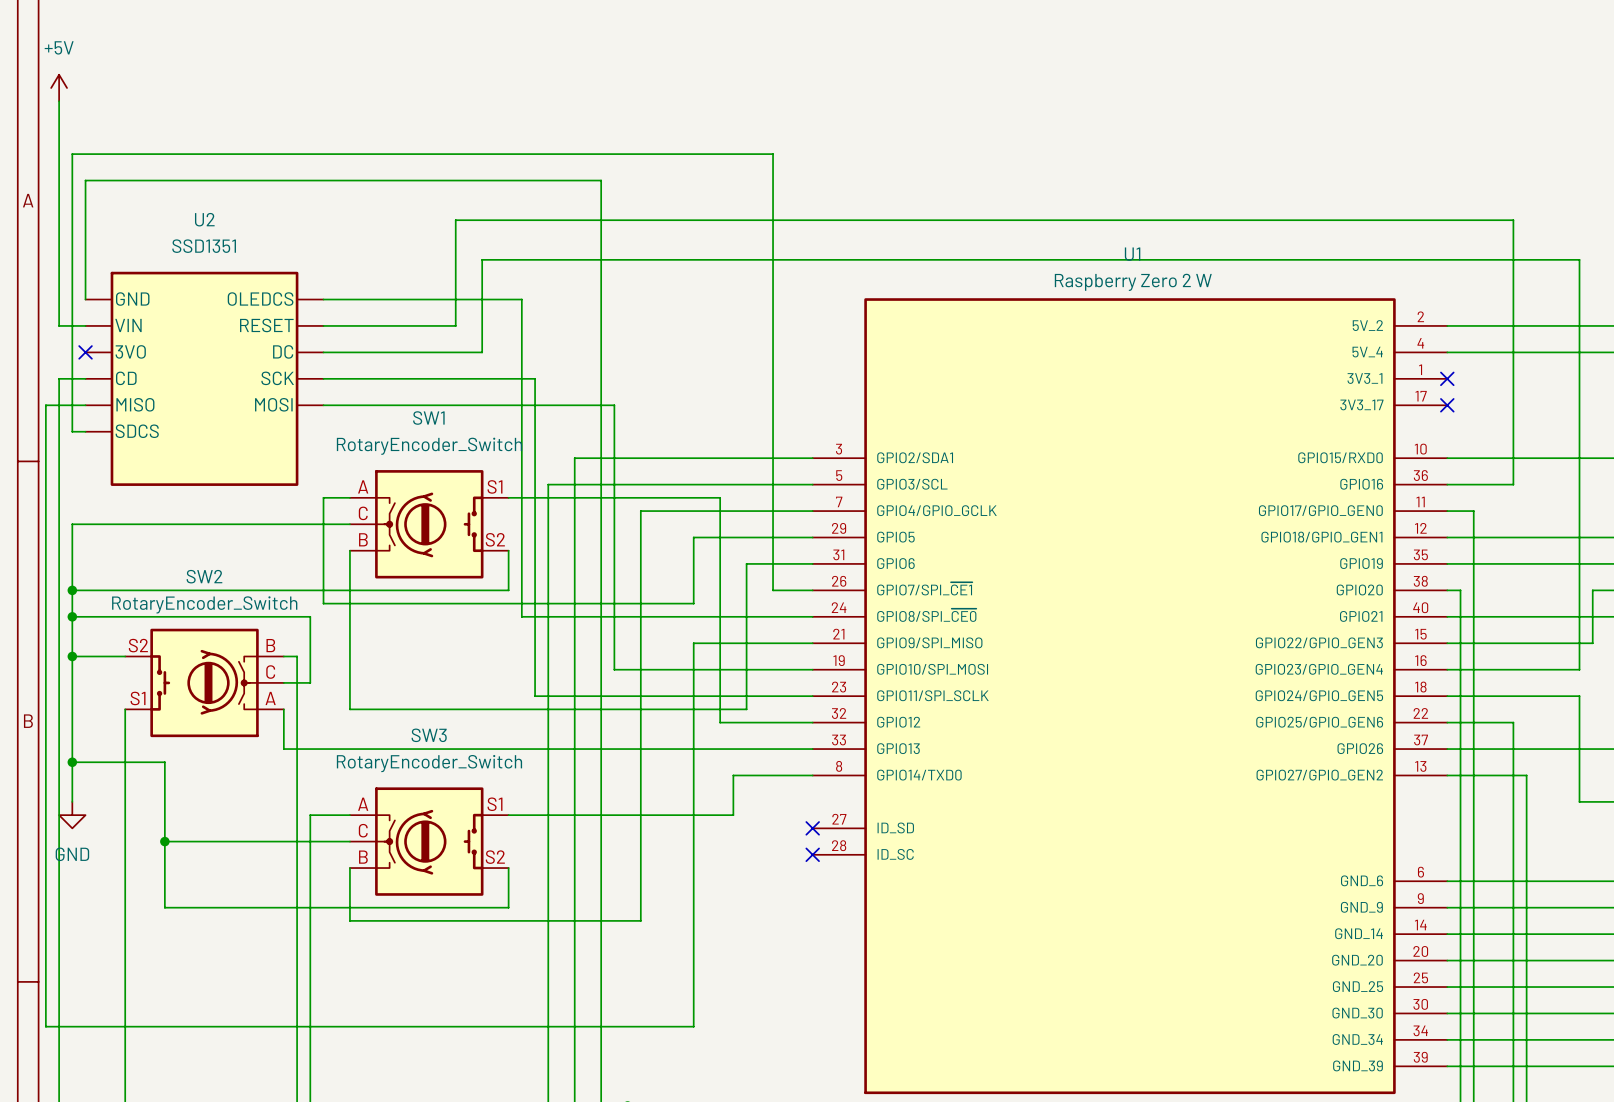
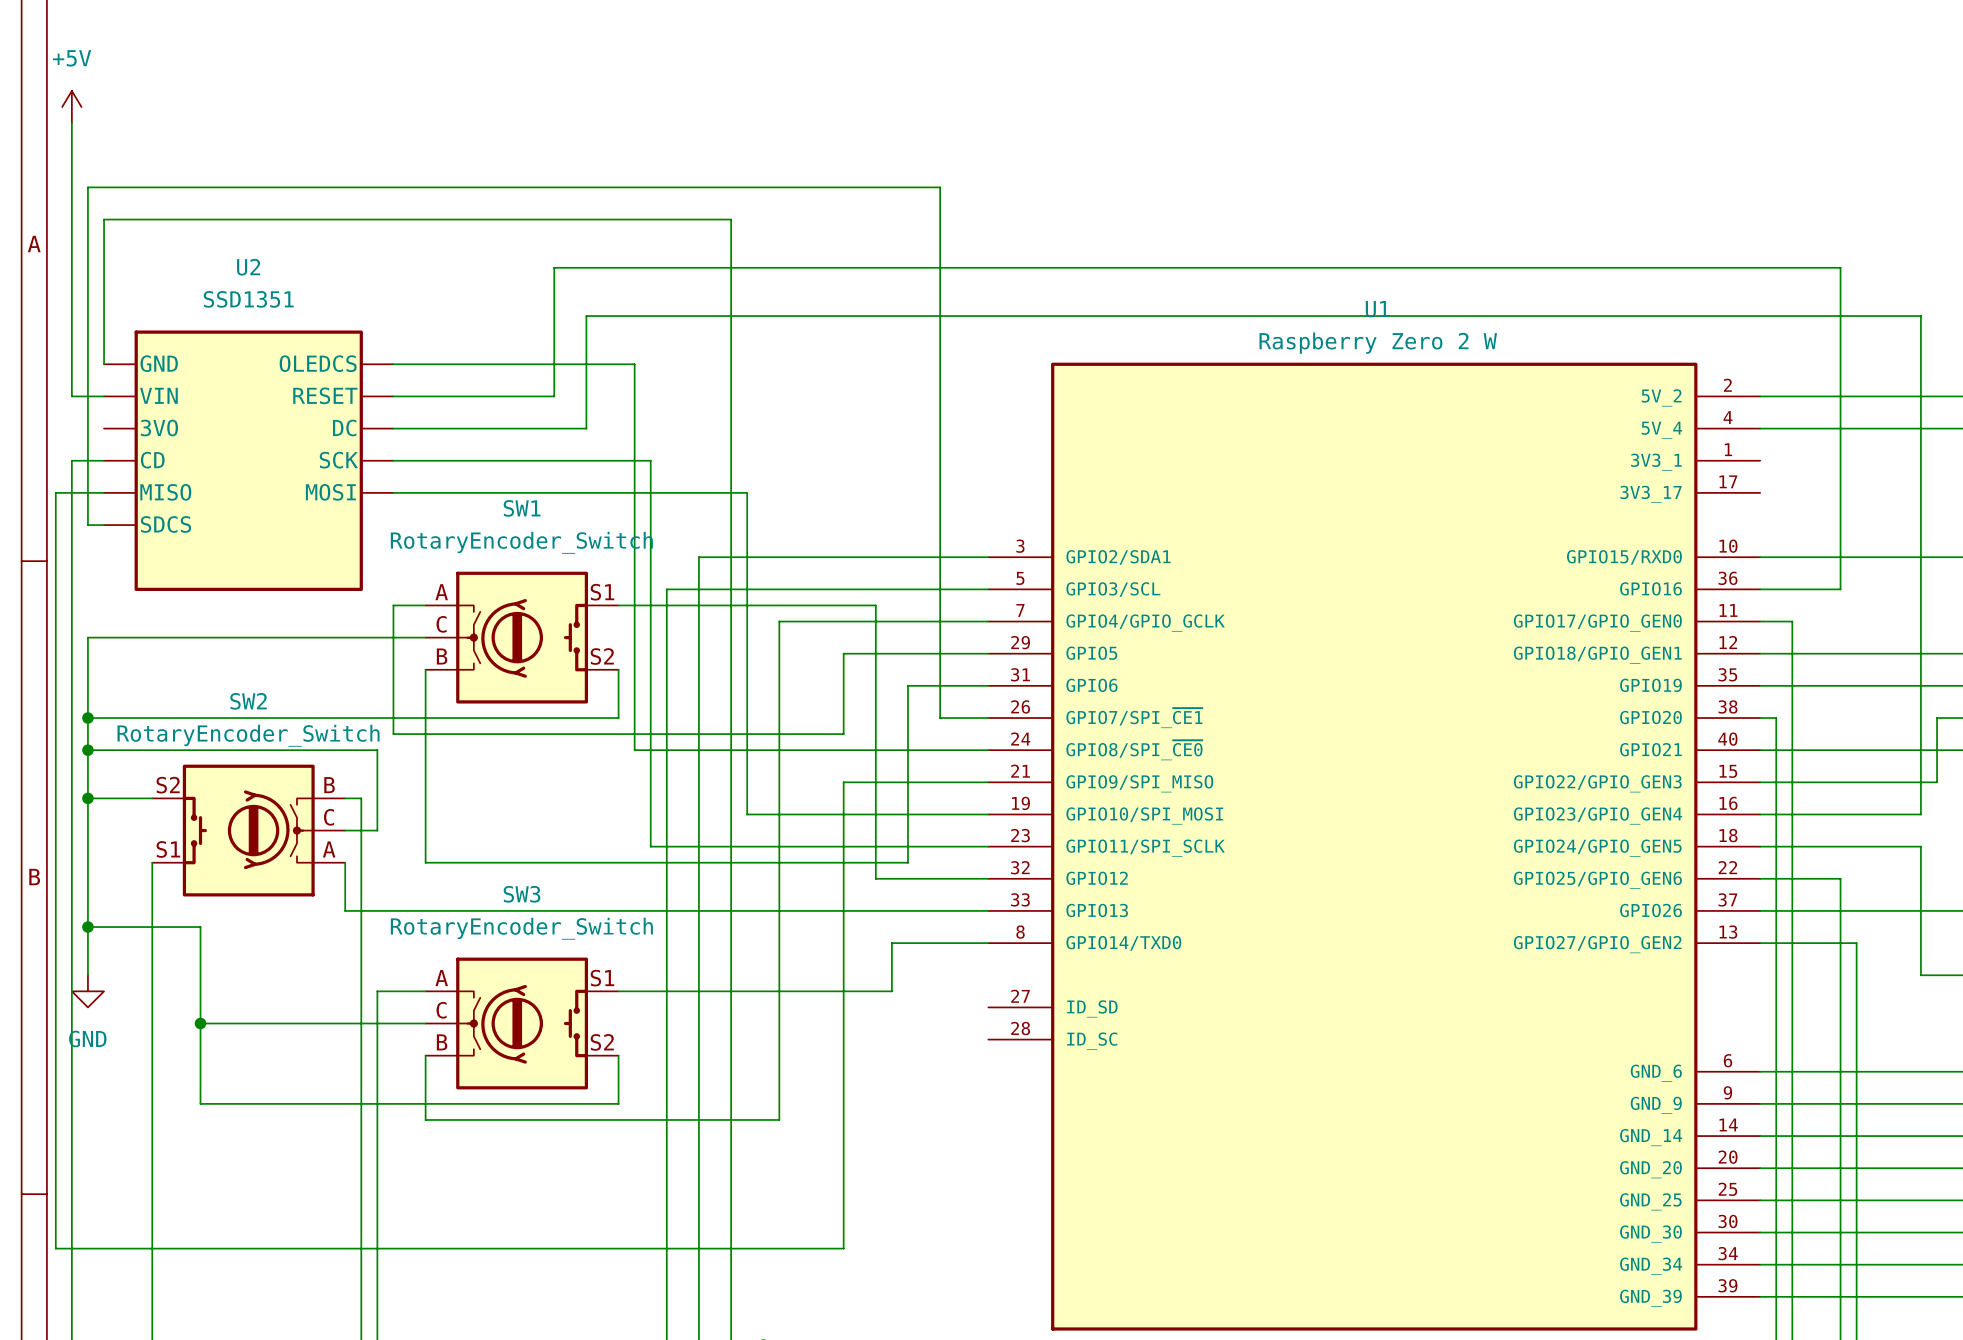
no-connect mark: (85, 352) -> none
no-connect mark: (1447, 378) -> none
no-connect mark: (1447, 405) -> none
no-connect mark: (812, 828) -> none
no-connect mark: (812, 854) -> none

